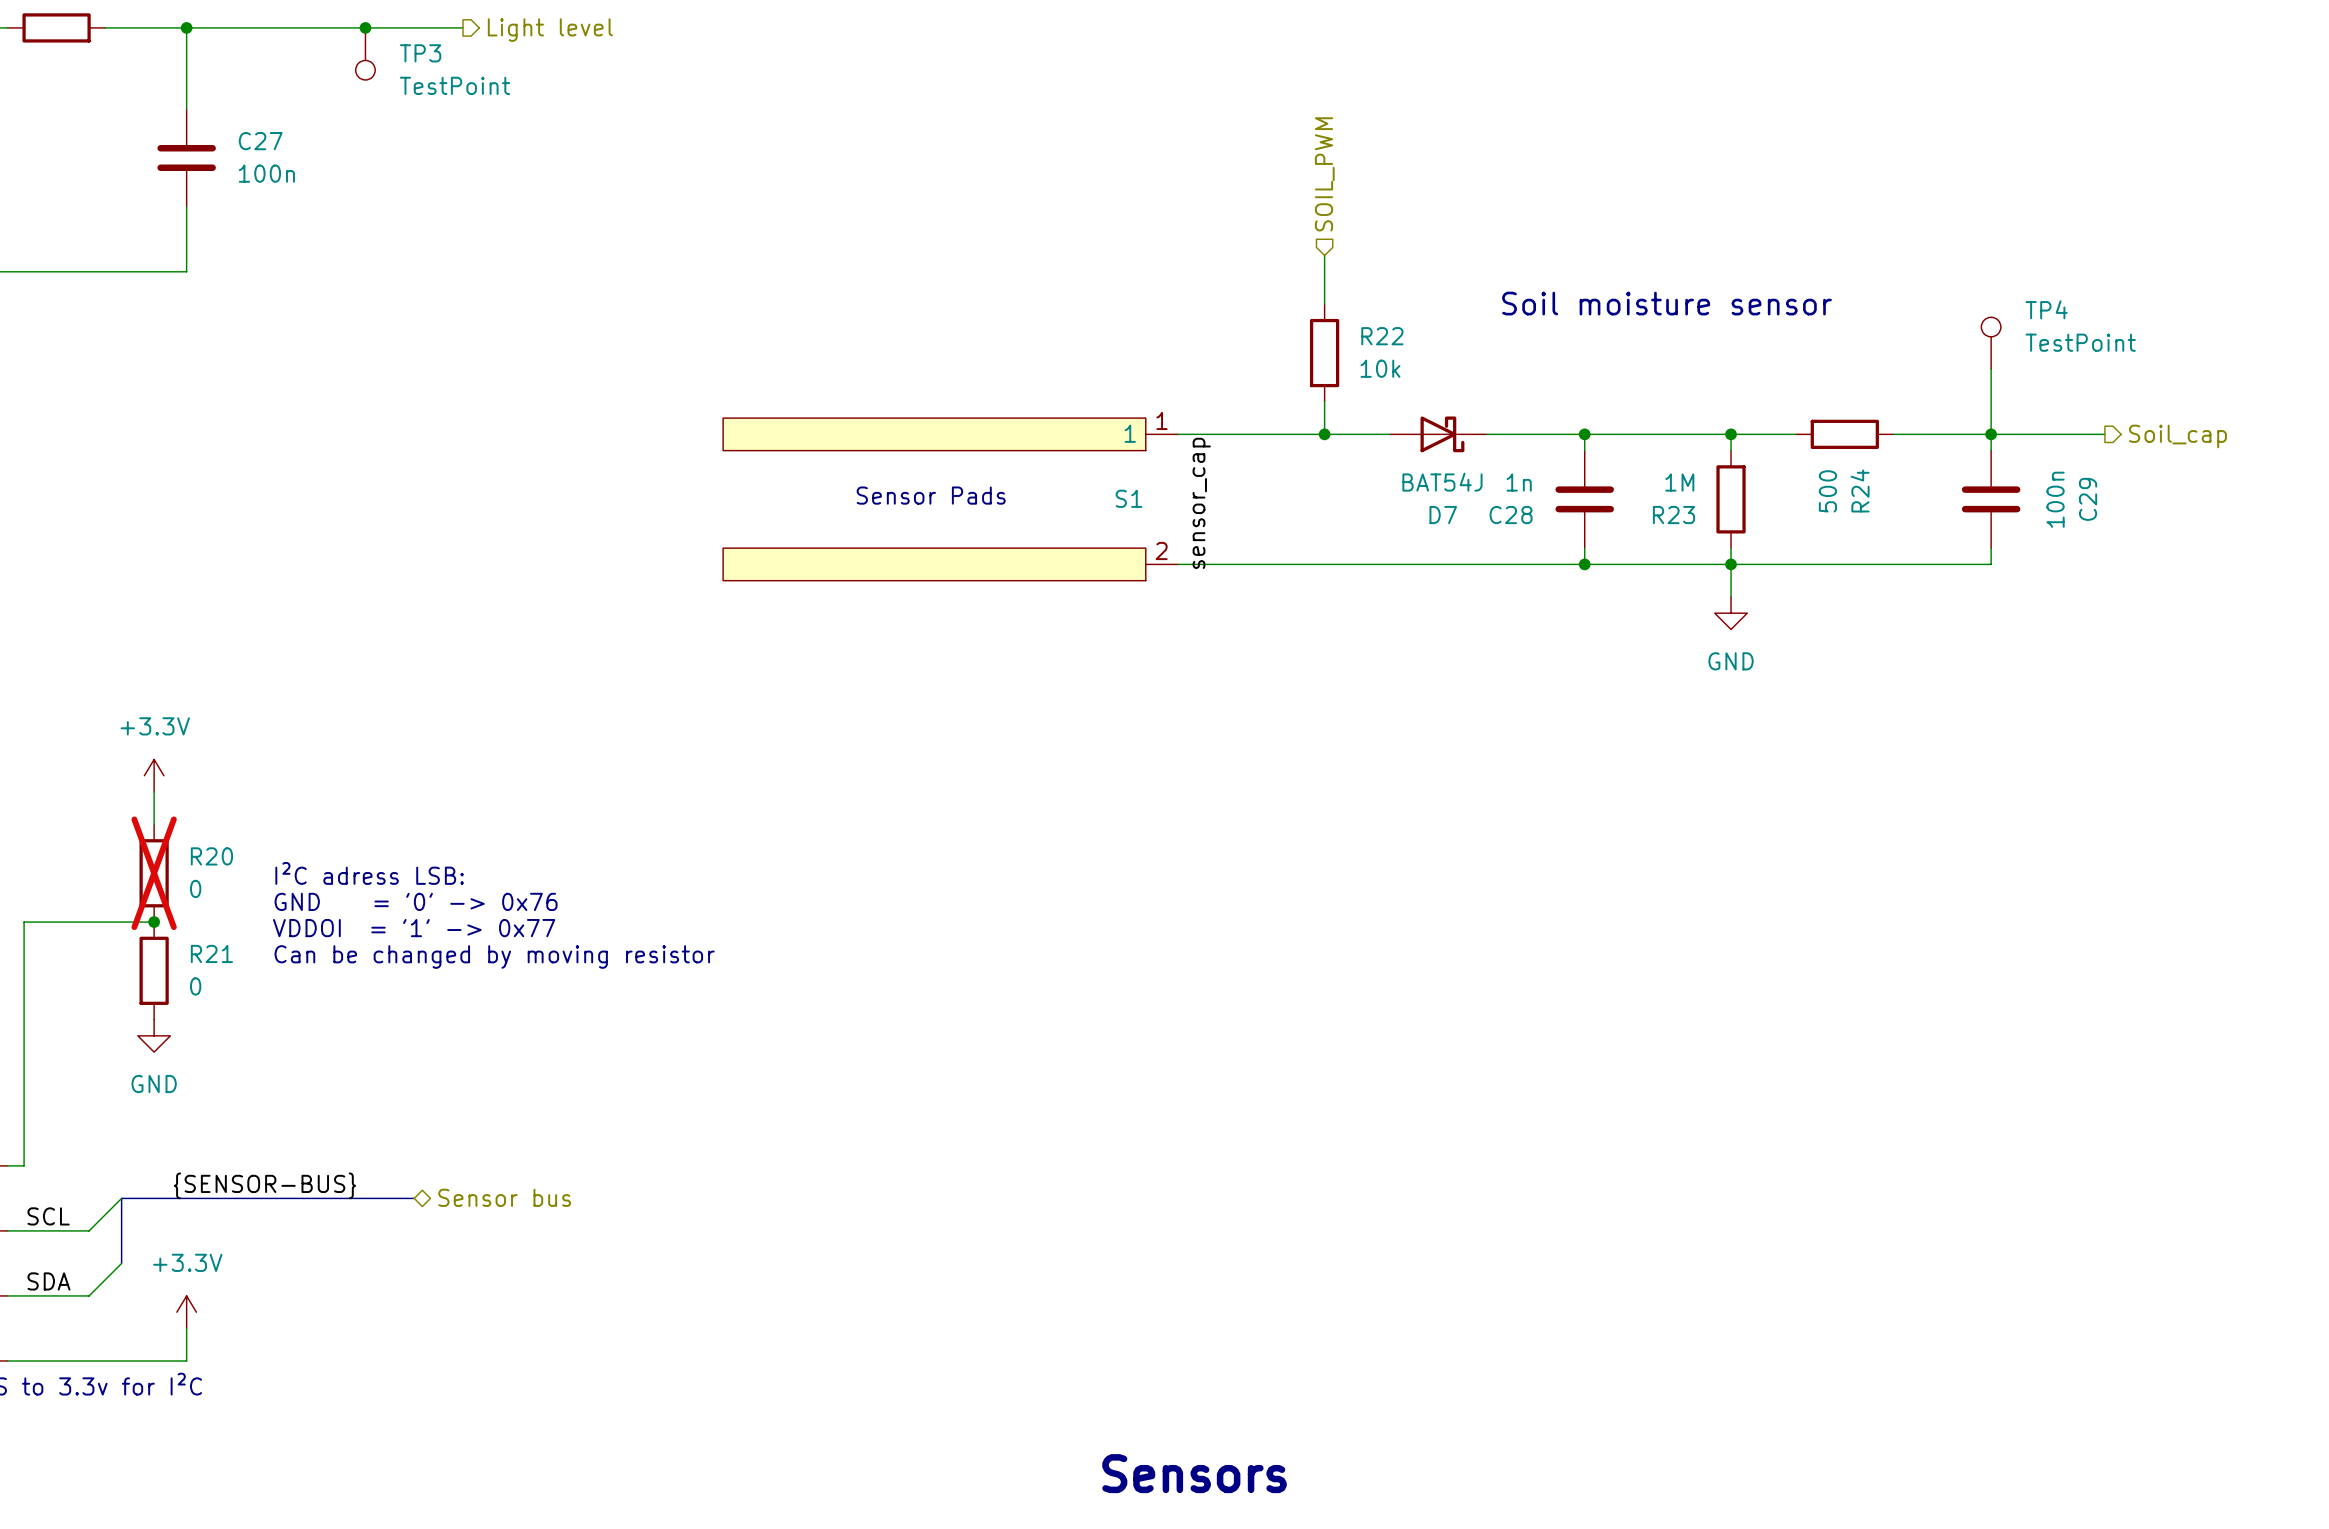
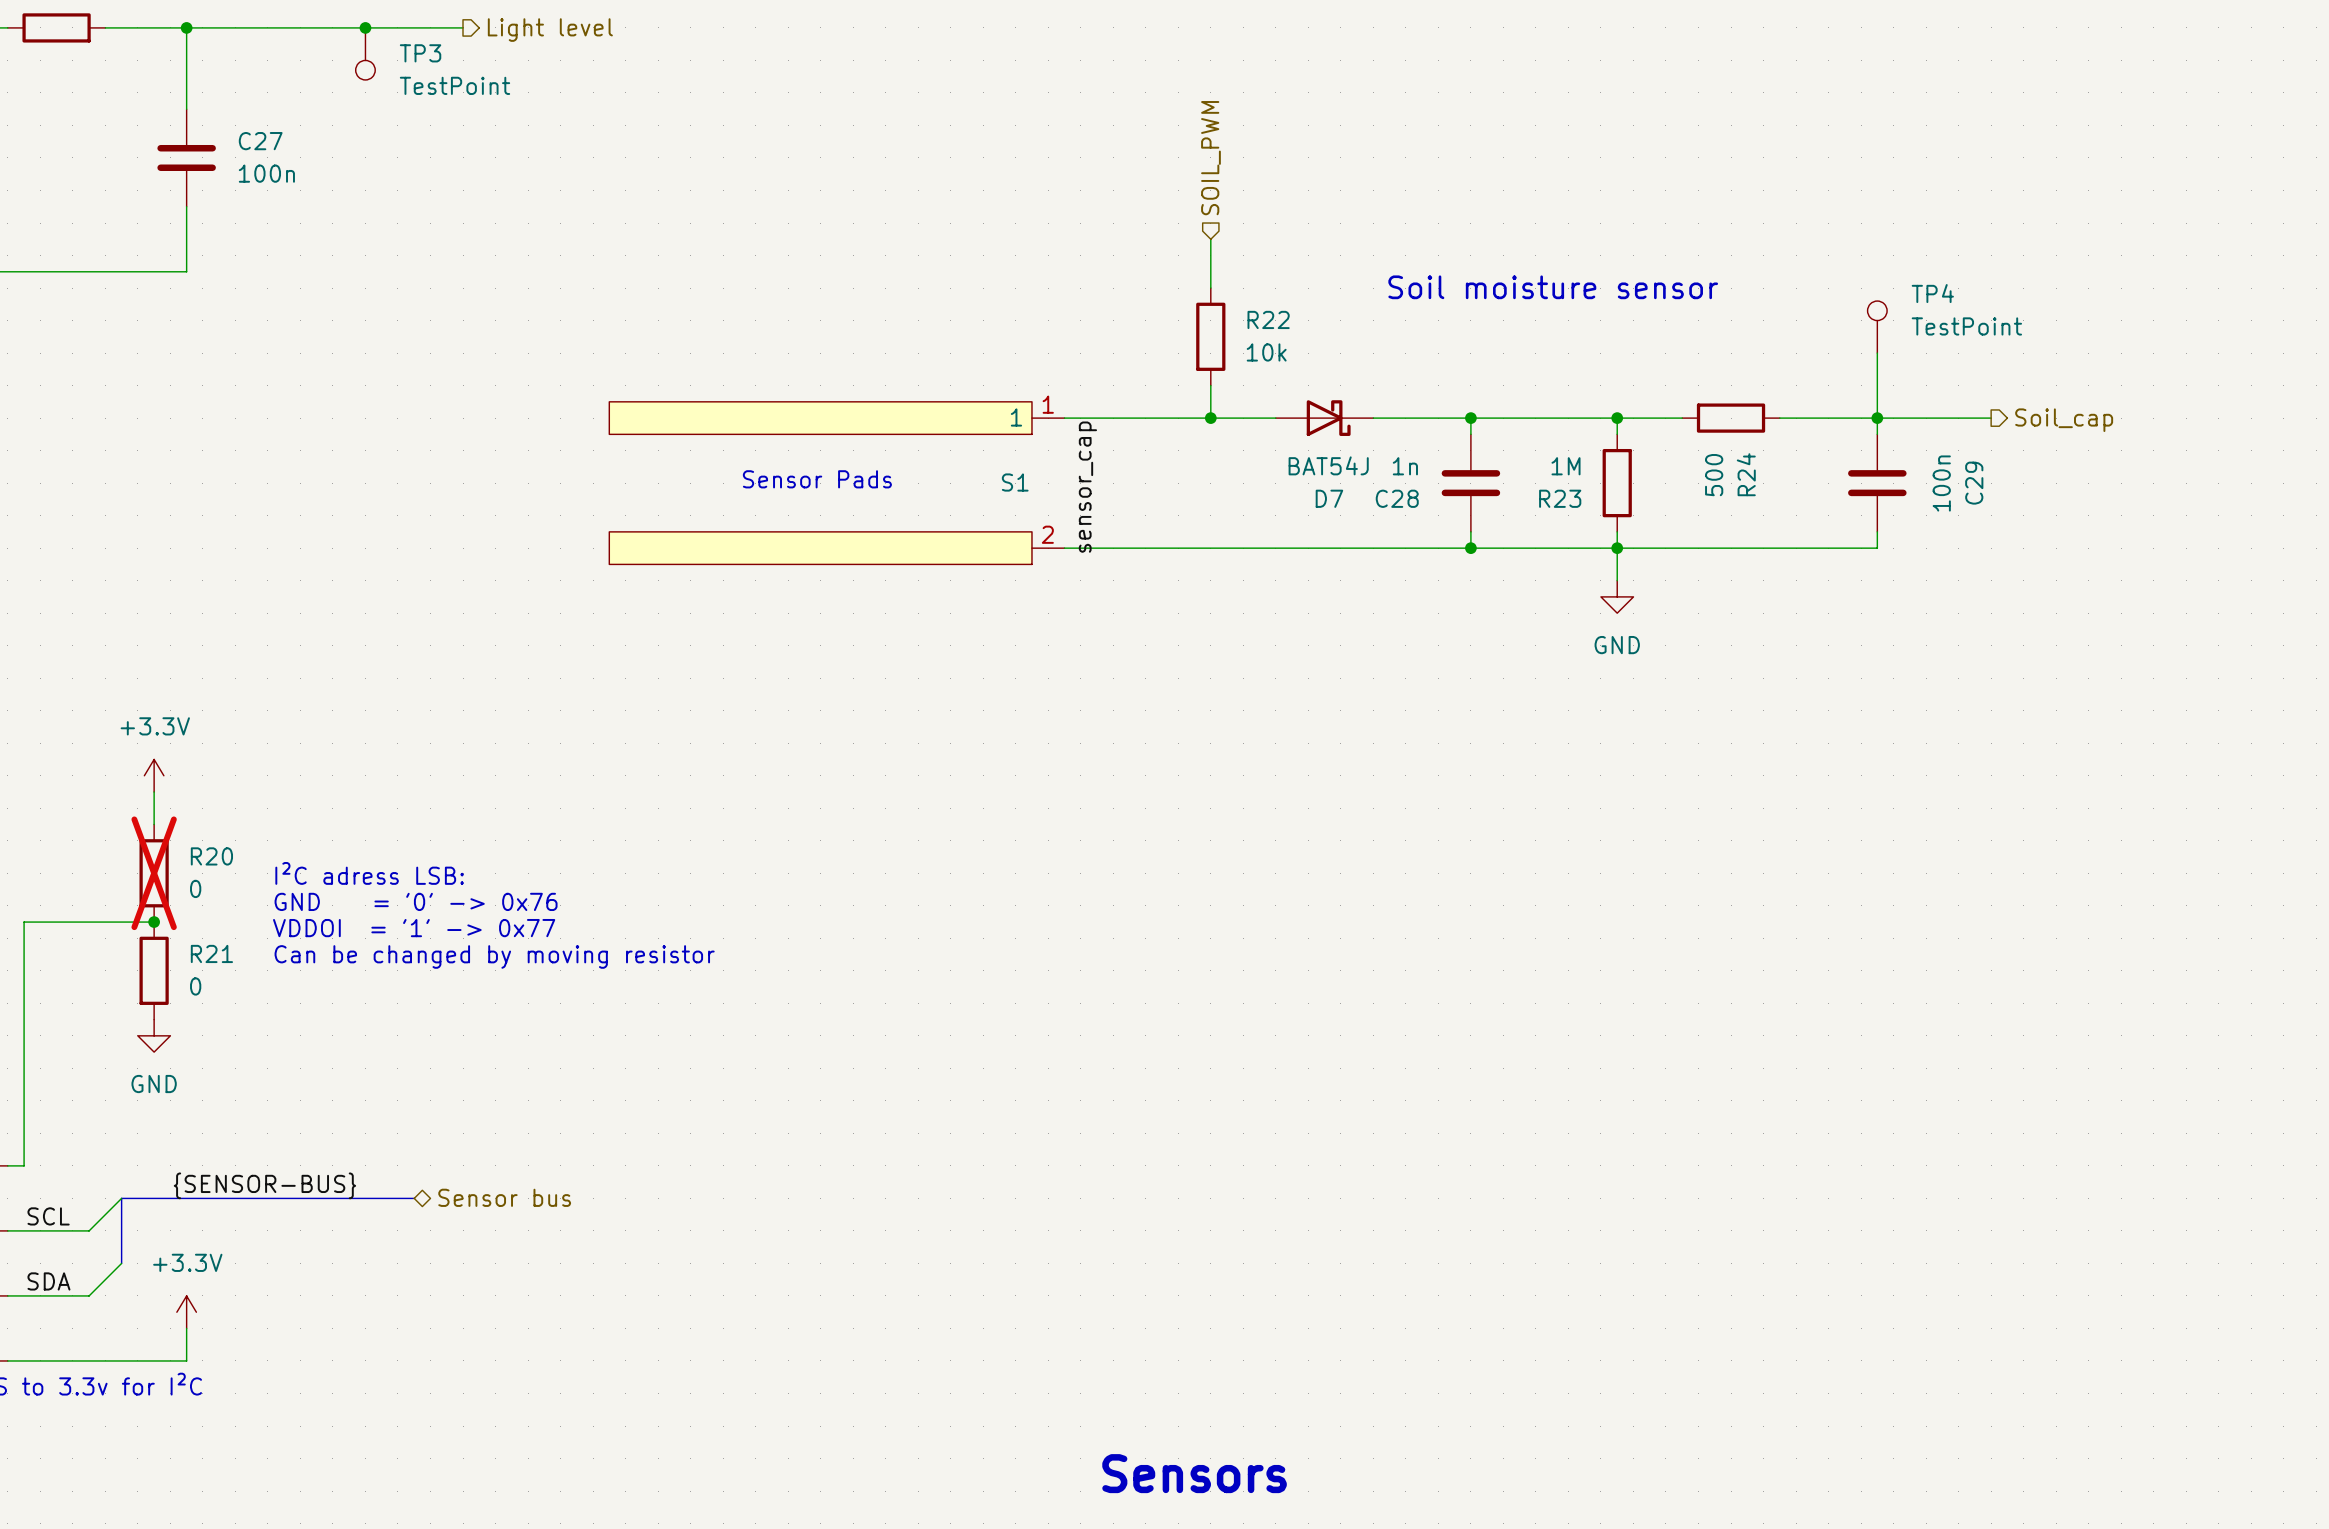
hierarchical label position: SOIL_PWM (1324, 174) -> SOIL_PWM (1210, 158)
wire: (1324, 255) (1324, 304) -> (1210, 239) (1210, 288)
text position: Soil moisture sensor (1667, 303) -> Soil moisture sensor (1553, 287)
TP4 position: (1991, 343) -> (1877, 327)
R22 position: (1324, 353) -> (1210, 336)
wire: (1991, 369) (1991, 450) -> (1877, 353) (1877, 434)
wire: (1324, 401) (1324, 434) -> (1210, 385) (1210, 418)
junction: none -> (1210, 418)
junction: none -> (1470, 418)
junction: none -> (1877, 418)
wire: (1178, 434) (1389, 434) -> (1064, 418) (1275, 418)
junction: (1324, 434) -> none
D7 position: (1438, 434) -> (1324, 418)
wire: (1487, 434) (1796, 434) -> (1373, 418) (1682, 418)
wire: (1584, 434) (1584, 450) -> (1470, 418) (1470, 434)
junction position: (1584, 434) -> (1617, 418)
wire: (1731, 434) (1731, 450) -> (1617, 418) (1617, 434)
junction: (1731, 434) -> none
R24 position: (1844, 434) -> (1731, 418)
wire: (1893, 434) (2104, 434) -> (1779, 418) (1991, 418)
junction: (1991, 434) -> none
hierarchical label position: Soil_cap (2177, 436) -> Soil_cap (2064, 420)
text position: Sensor Pads (931, 495) -> Sensor Pads (817, 479)
S1 position: (950, 499) -> (836, 483)
C28 position: (1584, 499) -> (1470, 483)
R23 position: (1731, 499) -> (1617, 483)
C29 position: (1991, 499) -> (1877, 483)
label position: sensor_cap (1201, 503) -> sensor_cap (1087, 487)
junction: none -> (1470, 548)
wire: (1584, 548) (1584, 564) -> (1470, 531) (1470, 548)
wire: (1731, 548) (1731, 596) -> (1617, 531) (1617, 580)
wire: (1991, 548) (1991, 564) (1178, 564) -> (1877, 531) (1877, 548) (1064, 548)
junction position: (1584, 564) -> (1617, 548)
junction: (1731, 564) -> none
power symbol position: GND (1731, 613) -> GND (1617, 596)

